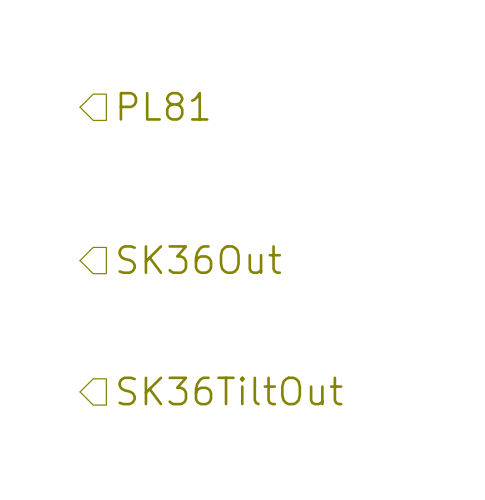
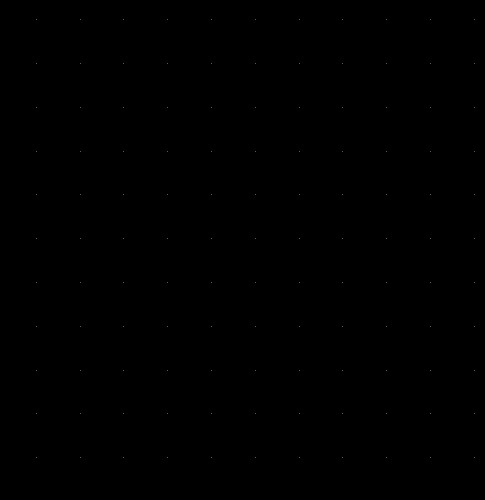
hierarchical label: PL81 (164, 106) -> none
hierarchical label: SK36Out (199, 259) -> none
hierarchical label: SK36TiltOut (230, 390) -> none

